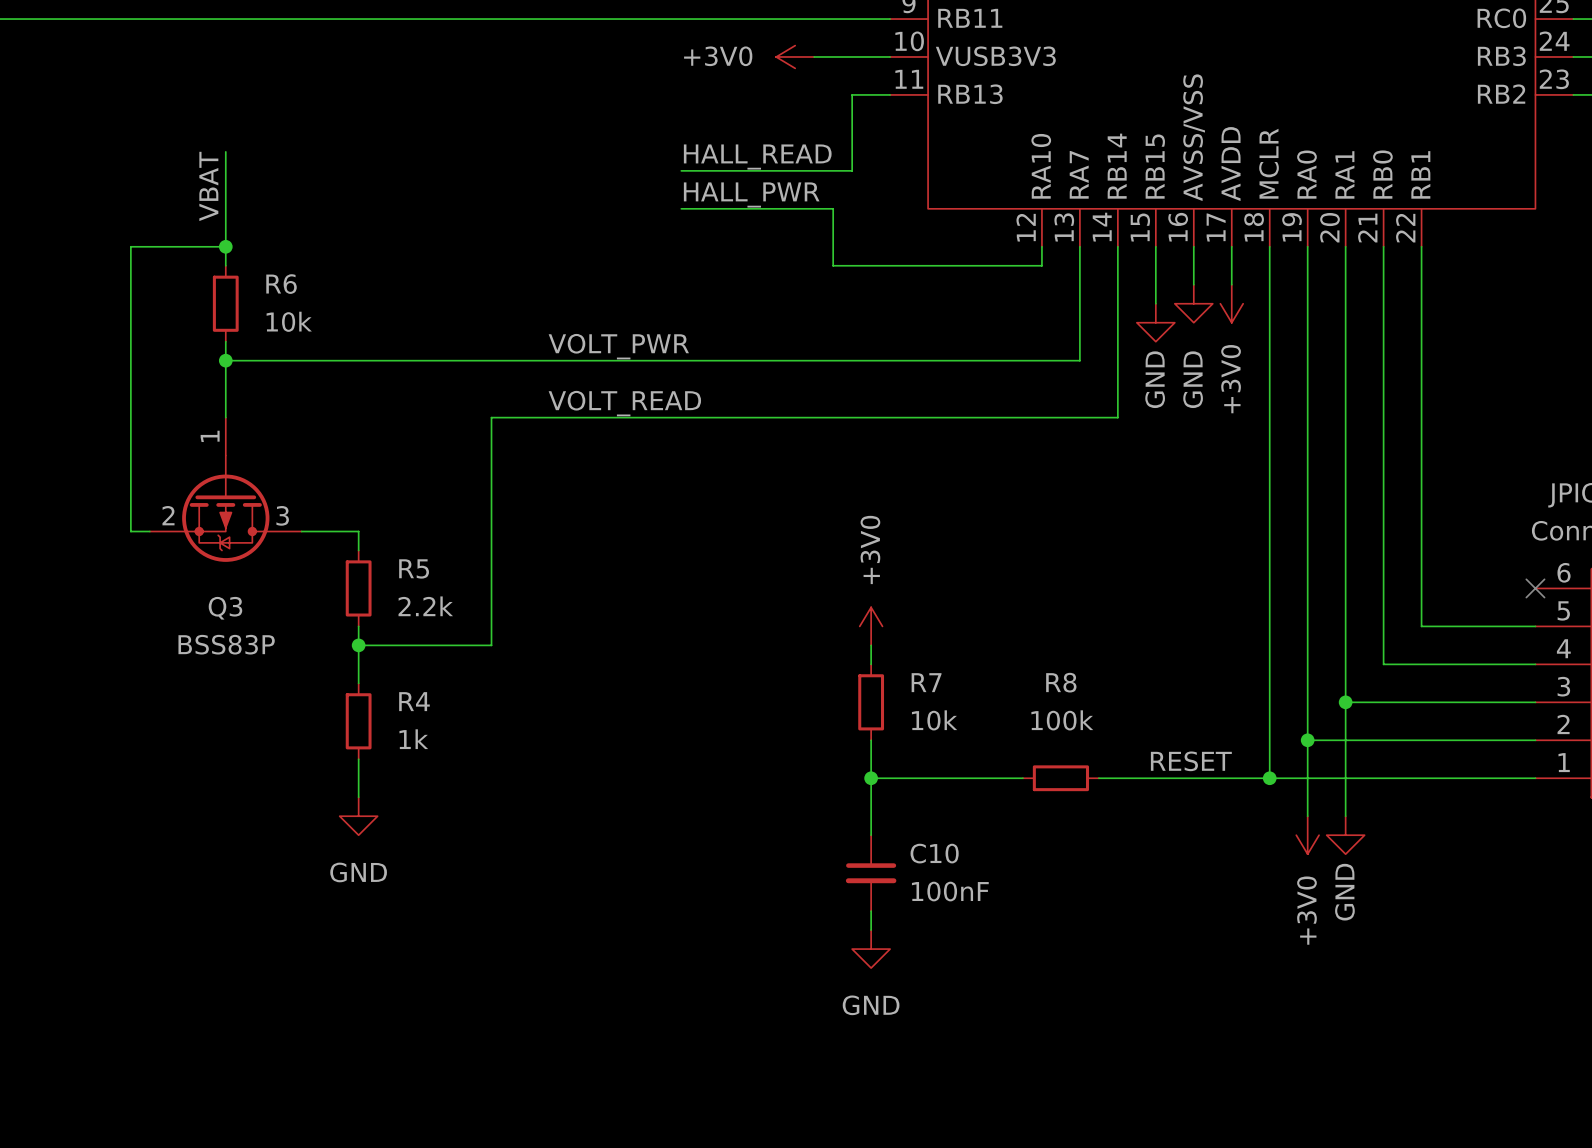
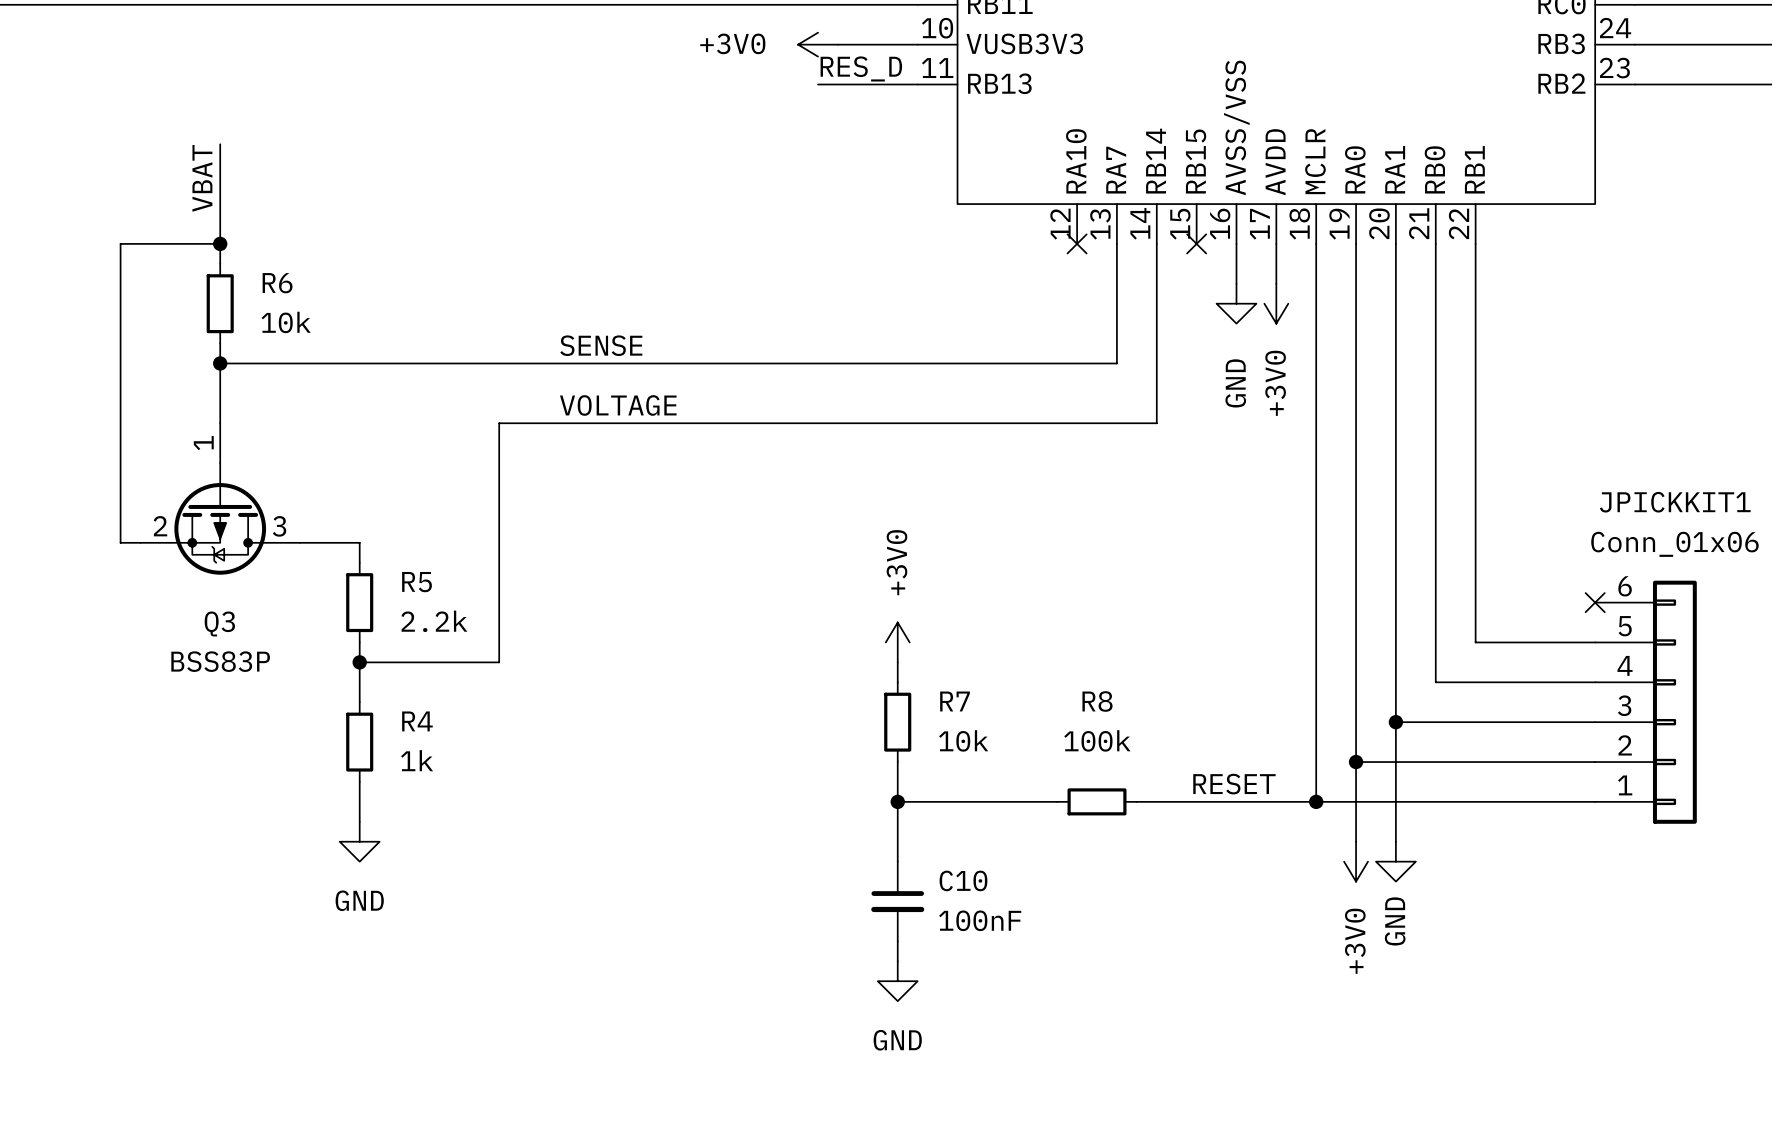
label: none -> RES_D (861, 68)
wire: (852, 94) (852, 170) (681, 170) -> (877, 84) (818, 84)
label: HALL_READ (757, 157) -> none
label: HALL_PWR (751, 194) -> none
wire: (681, 208) (833, 208) (833, 265) (1041, 265) (1041, 246) -> none
no-connect mark: none -> (1077, 243)
wire: (1155, 246) (1155, 303) -> none
no-connect mark: none -> (1196, 243)
power symbol: GND (1155, 322) -> none
label: VOLT_PWR (618, 346) -> SENSE (601, 345)
label: VOLT_READ (624, 403) -> VOLTAGE (618, 405)

